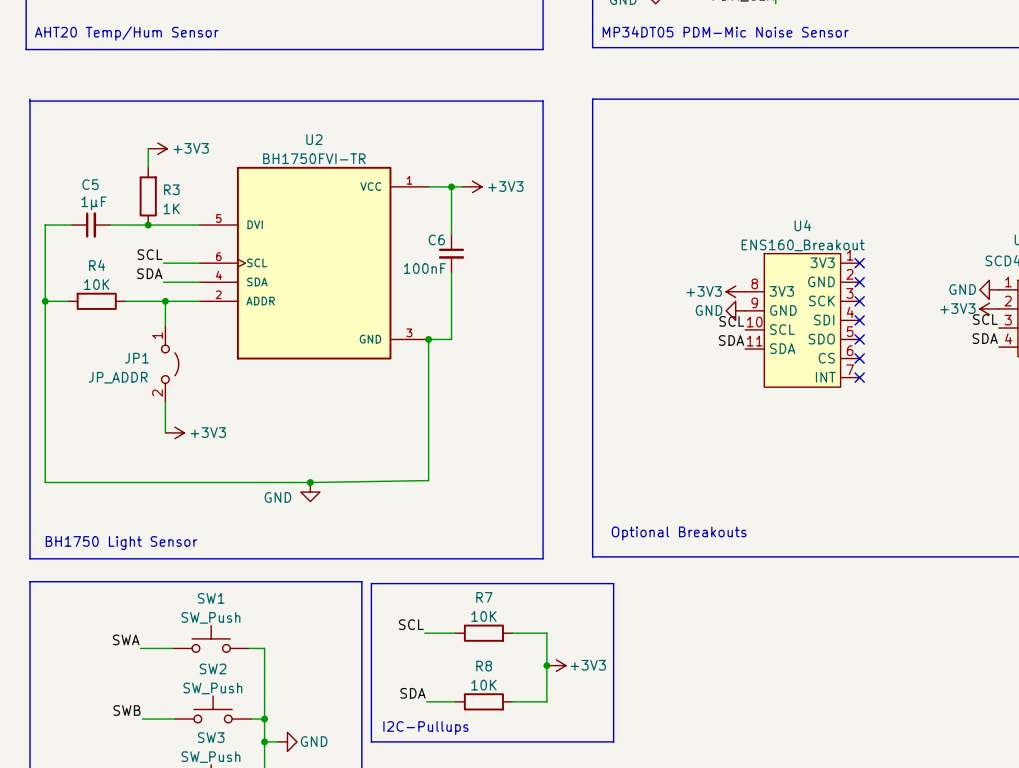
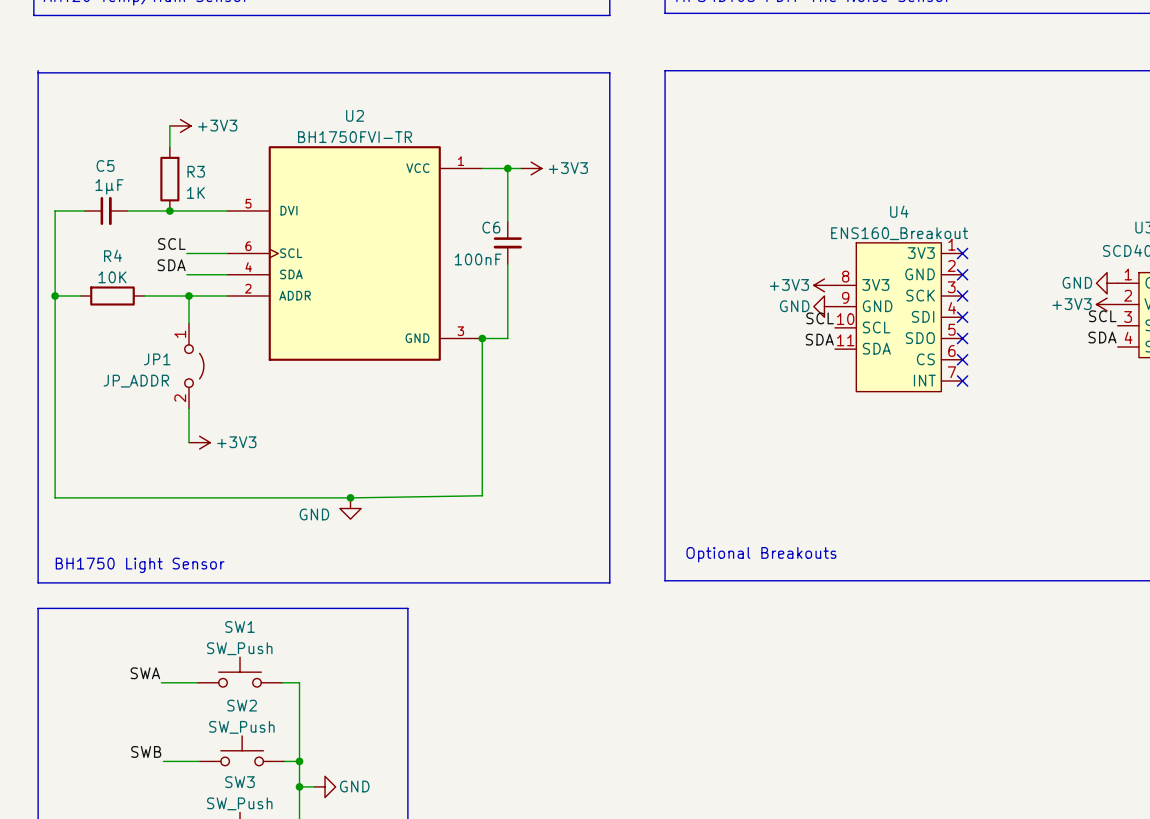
line: (371, 583) (613, 583) (613, 741) (371, 741) (371, 583) -> none
label: SCL (411, 624) -> none
wire: (424, 633) (455, 633) -> none
R7: 10K (483, 633) -> none
wire: (512, 633) (546, 633) (546, 701) (512, 701) -> none
junction: (546, 665) -> none
power symbol: +3V3 (556, 665) -> none
label: SDA (413, 693) -> none
wire: (426, 701) (455, 701) -> none
R8: 10K (483, 701) -> none
text: I2C-Pullups (425, 728) -> none

